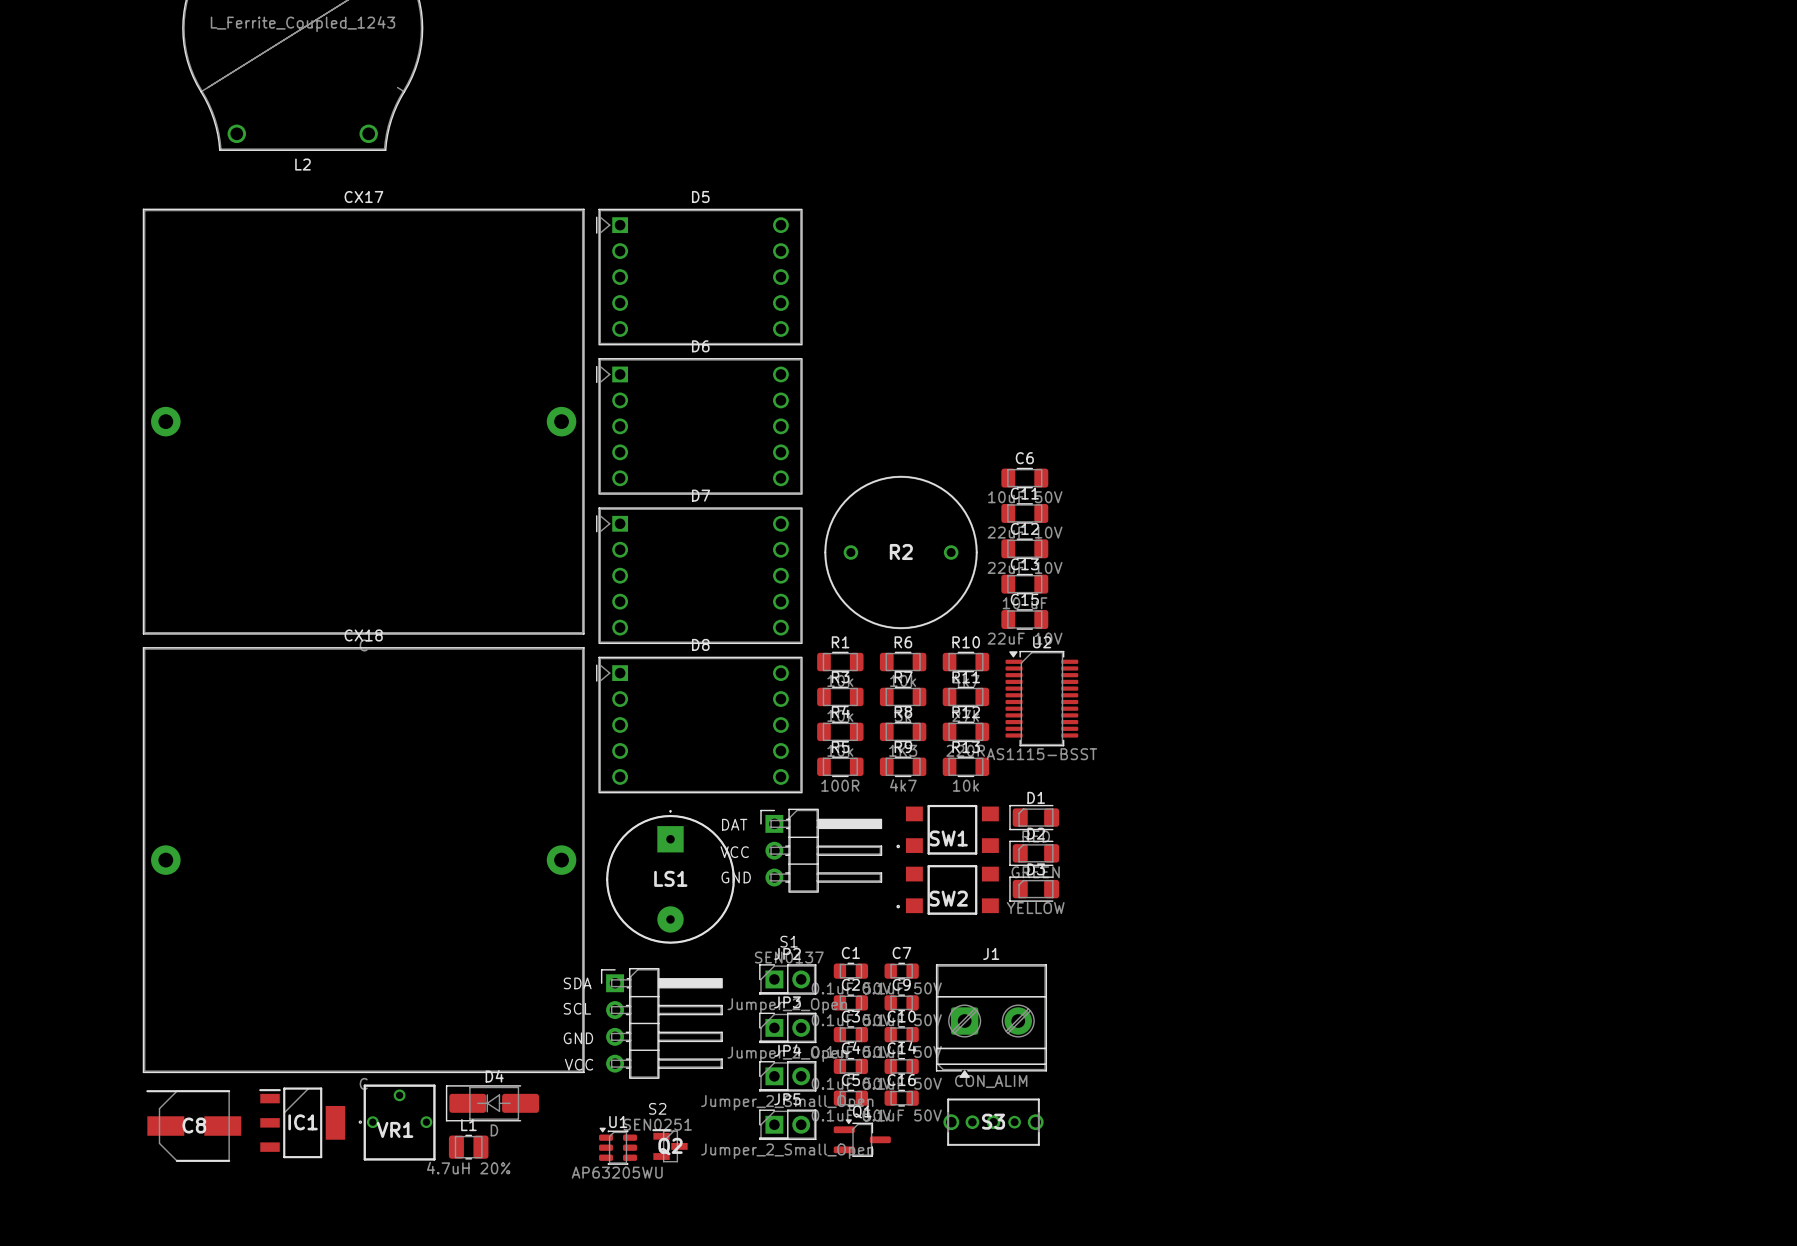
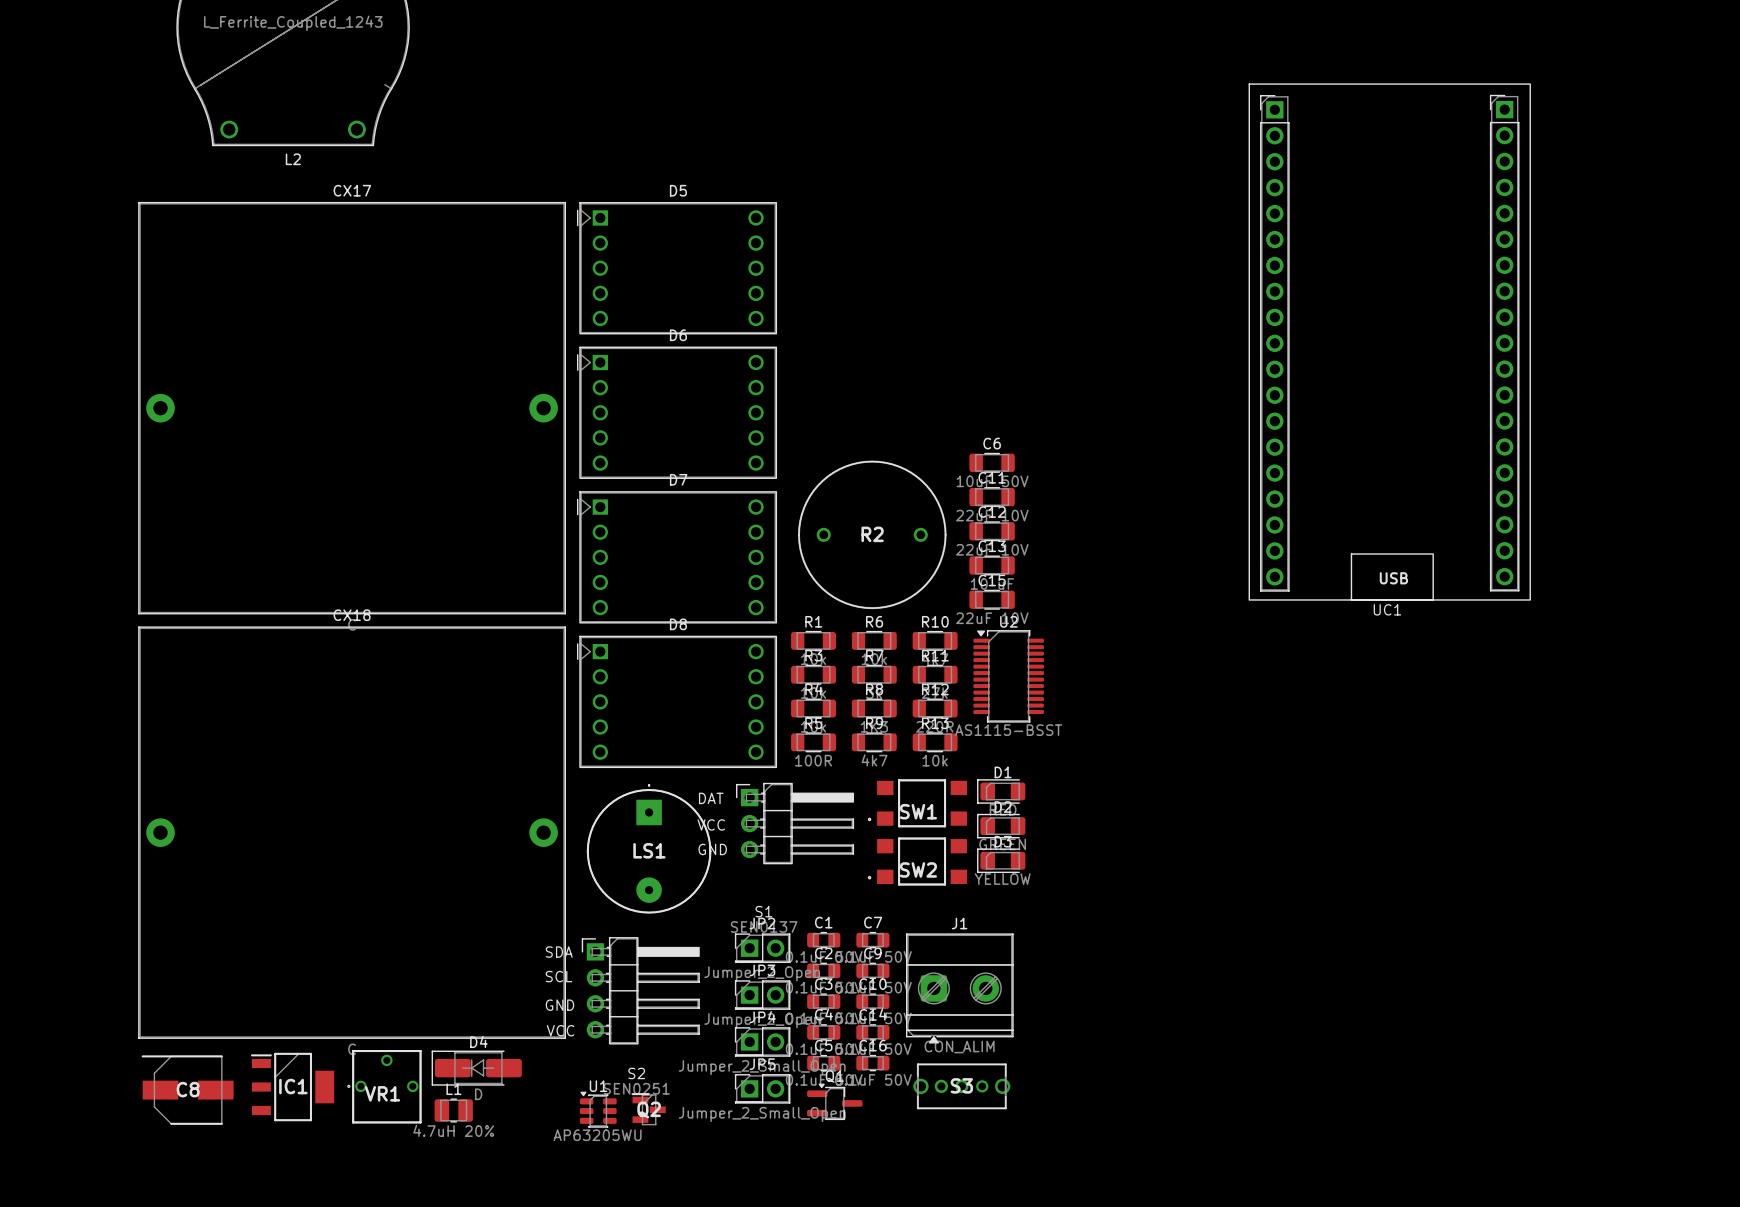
UC1: none -> (1389, 342)

